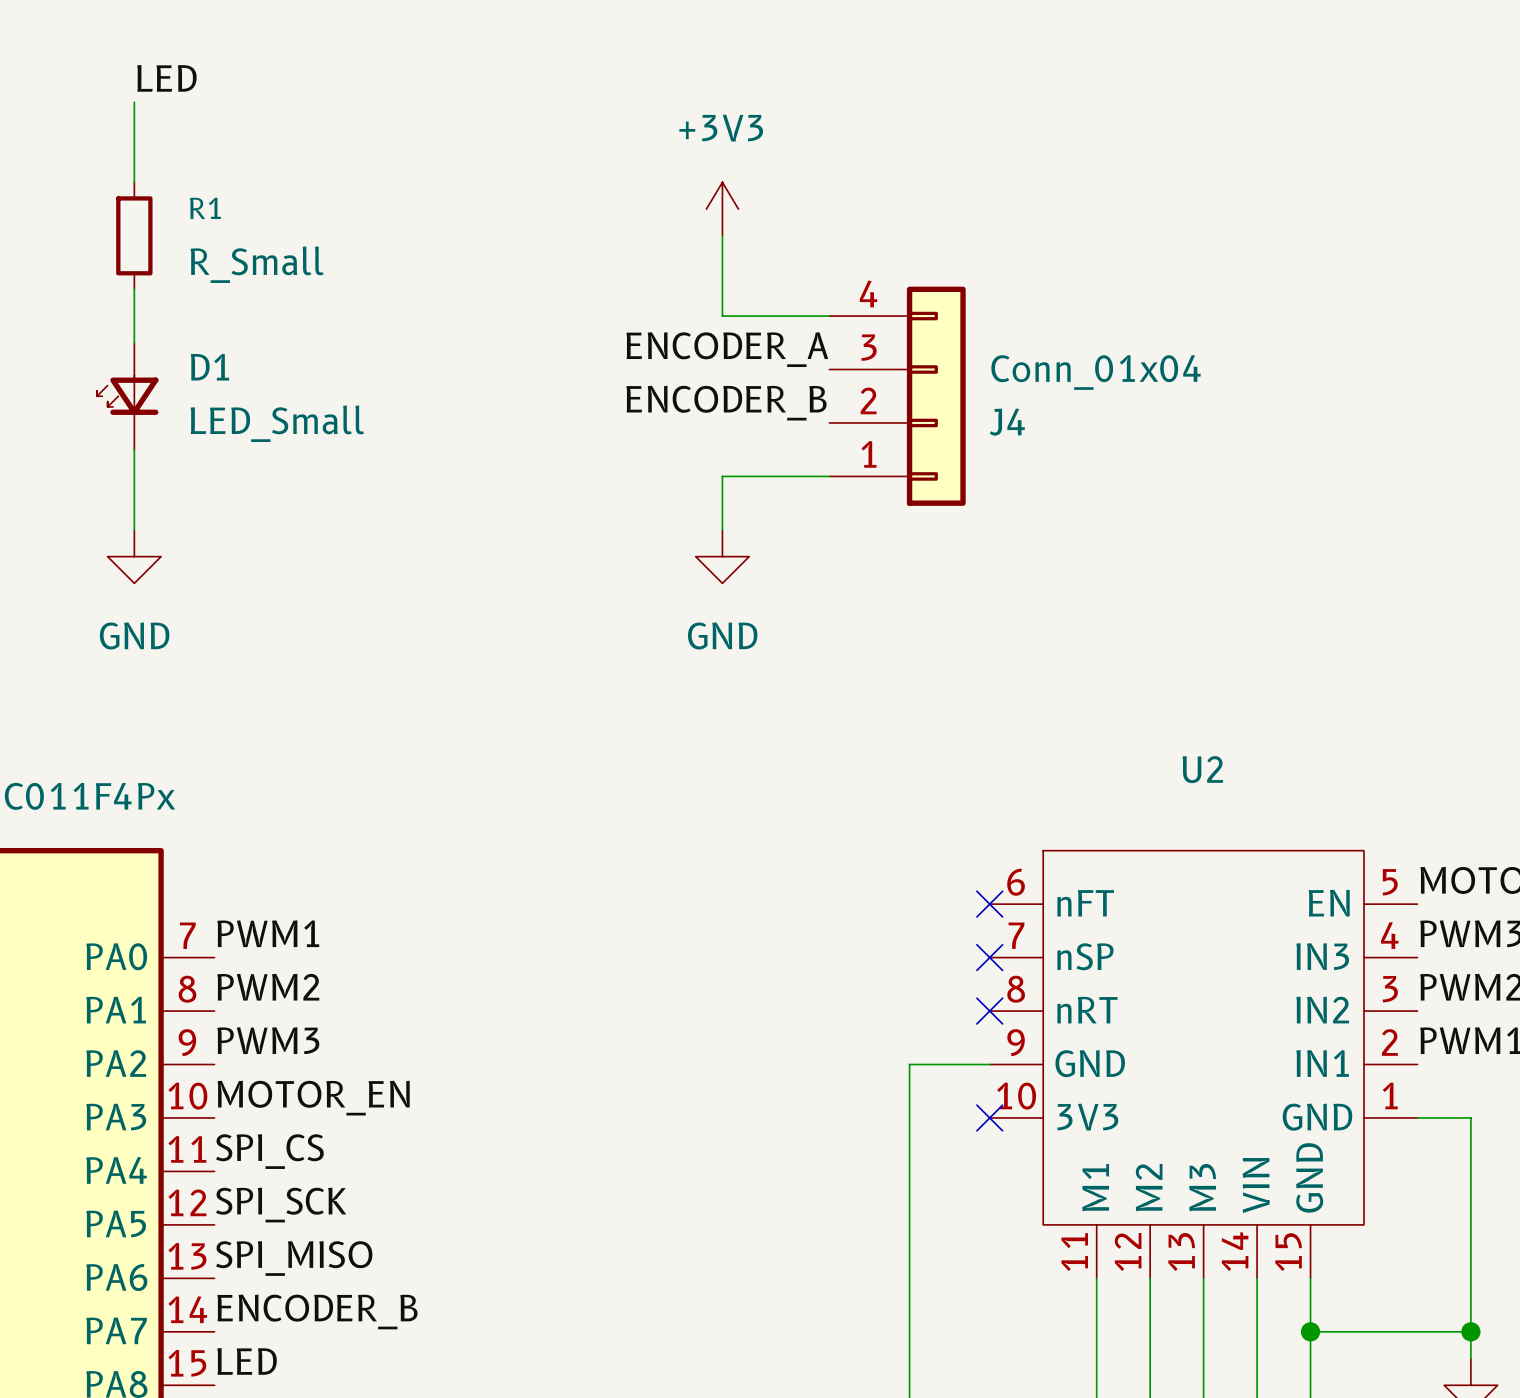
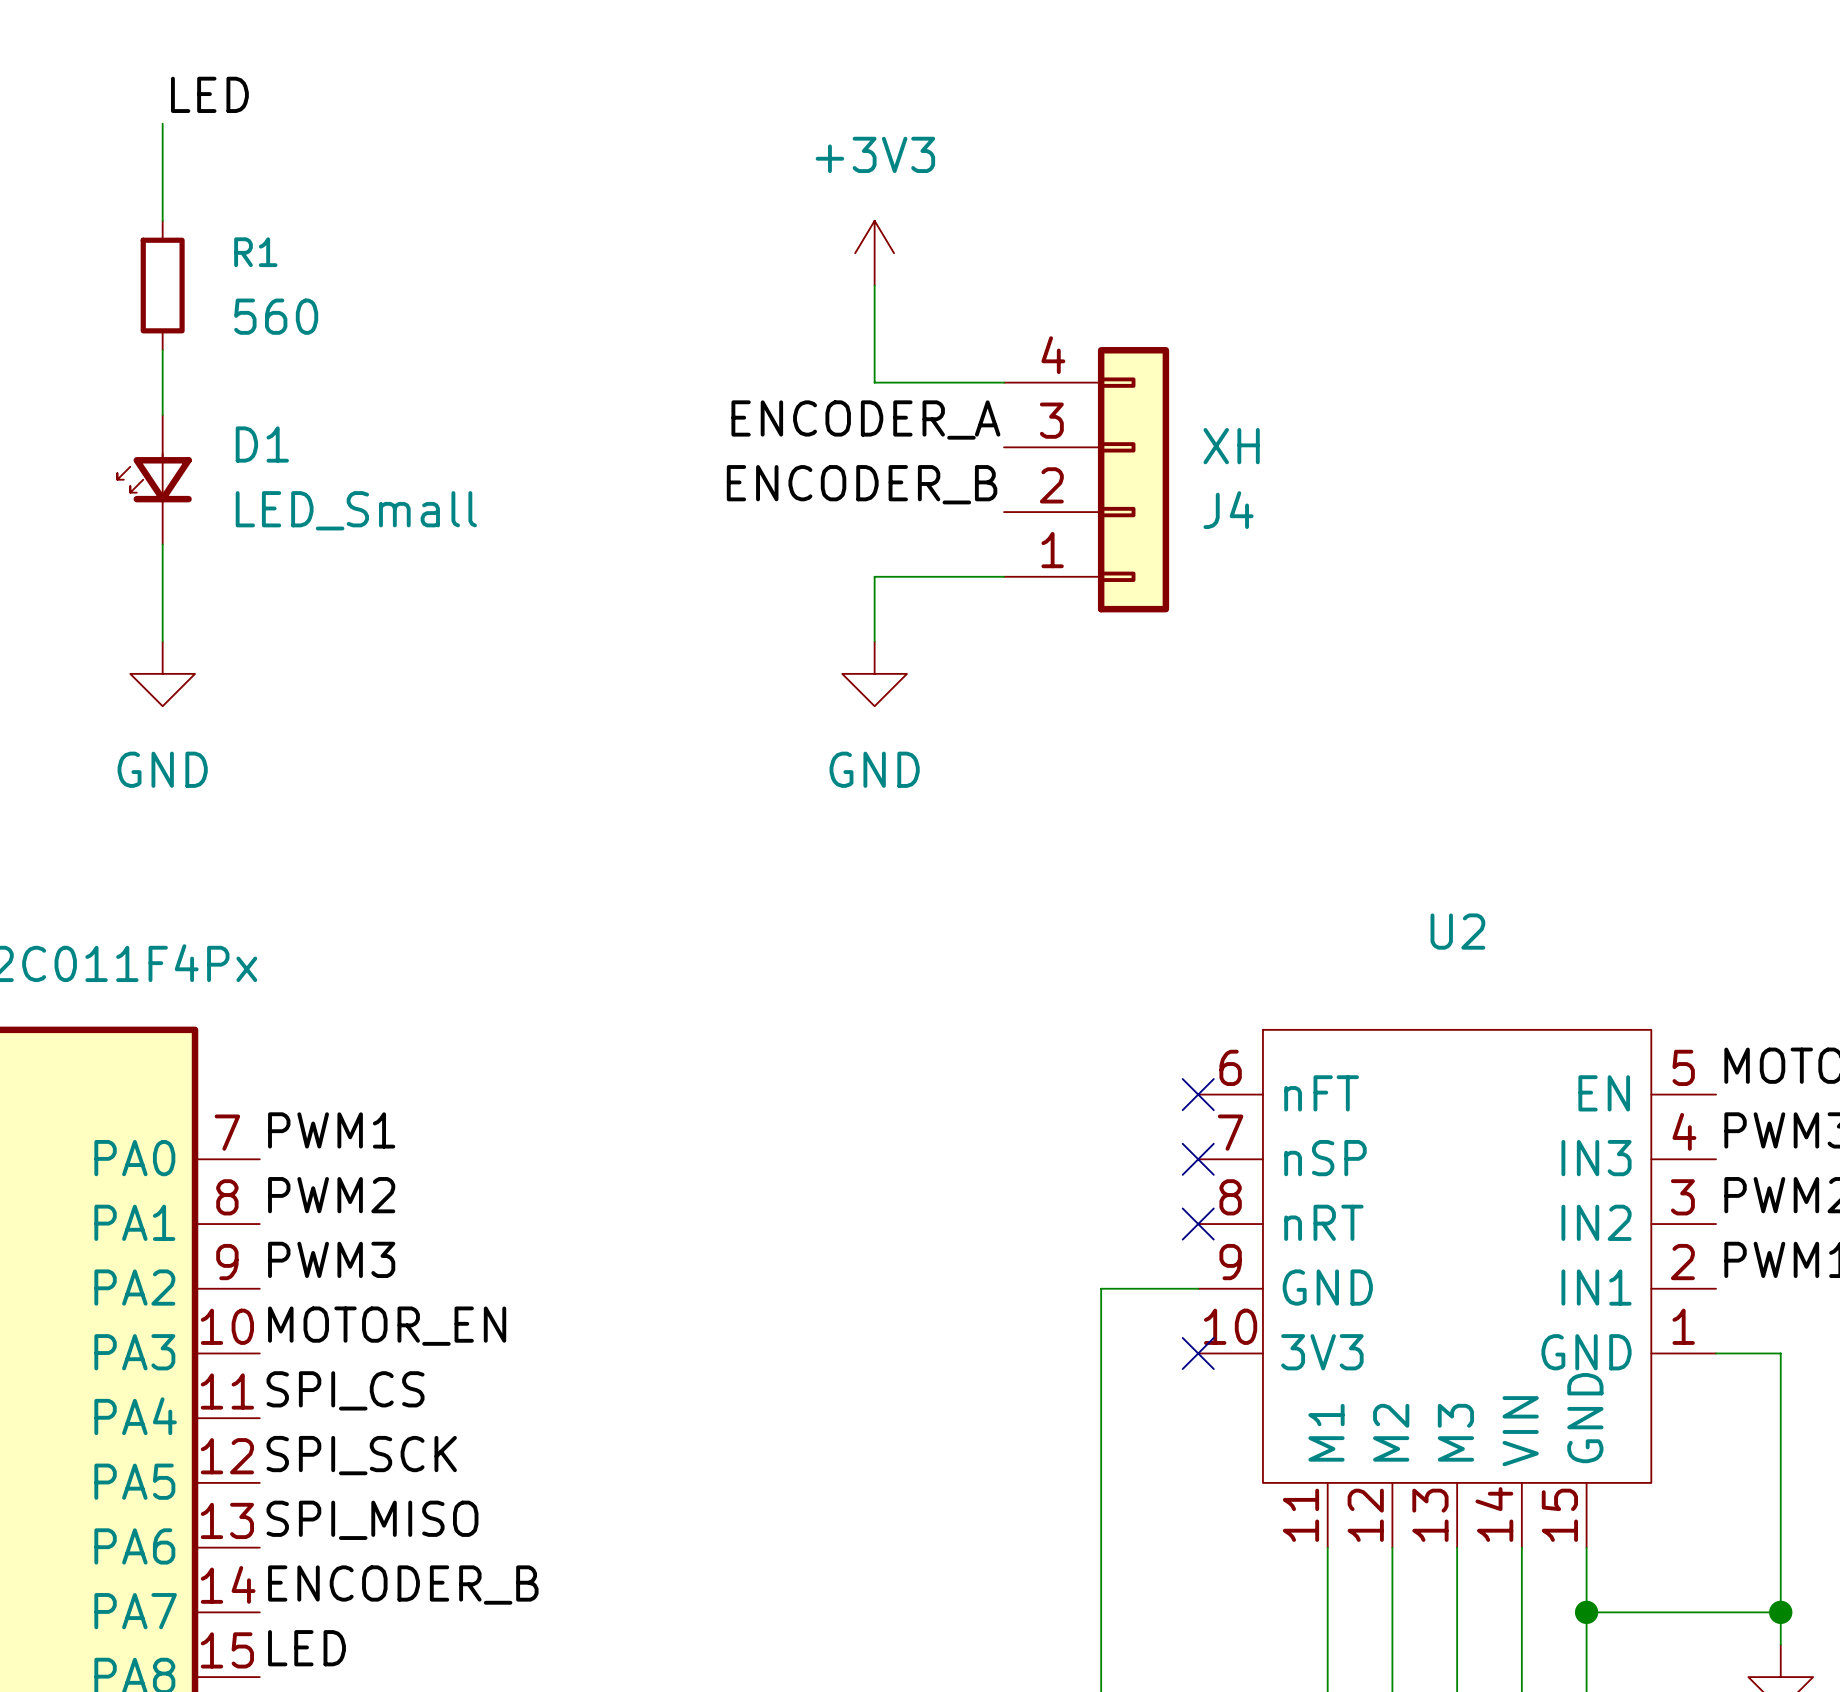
R1 value: R_Small (257, 264) -> 560 (276, 316)
J4 value: Conn_01x04 (1096, 372) -> XH (1231, 446)

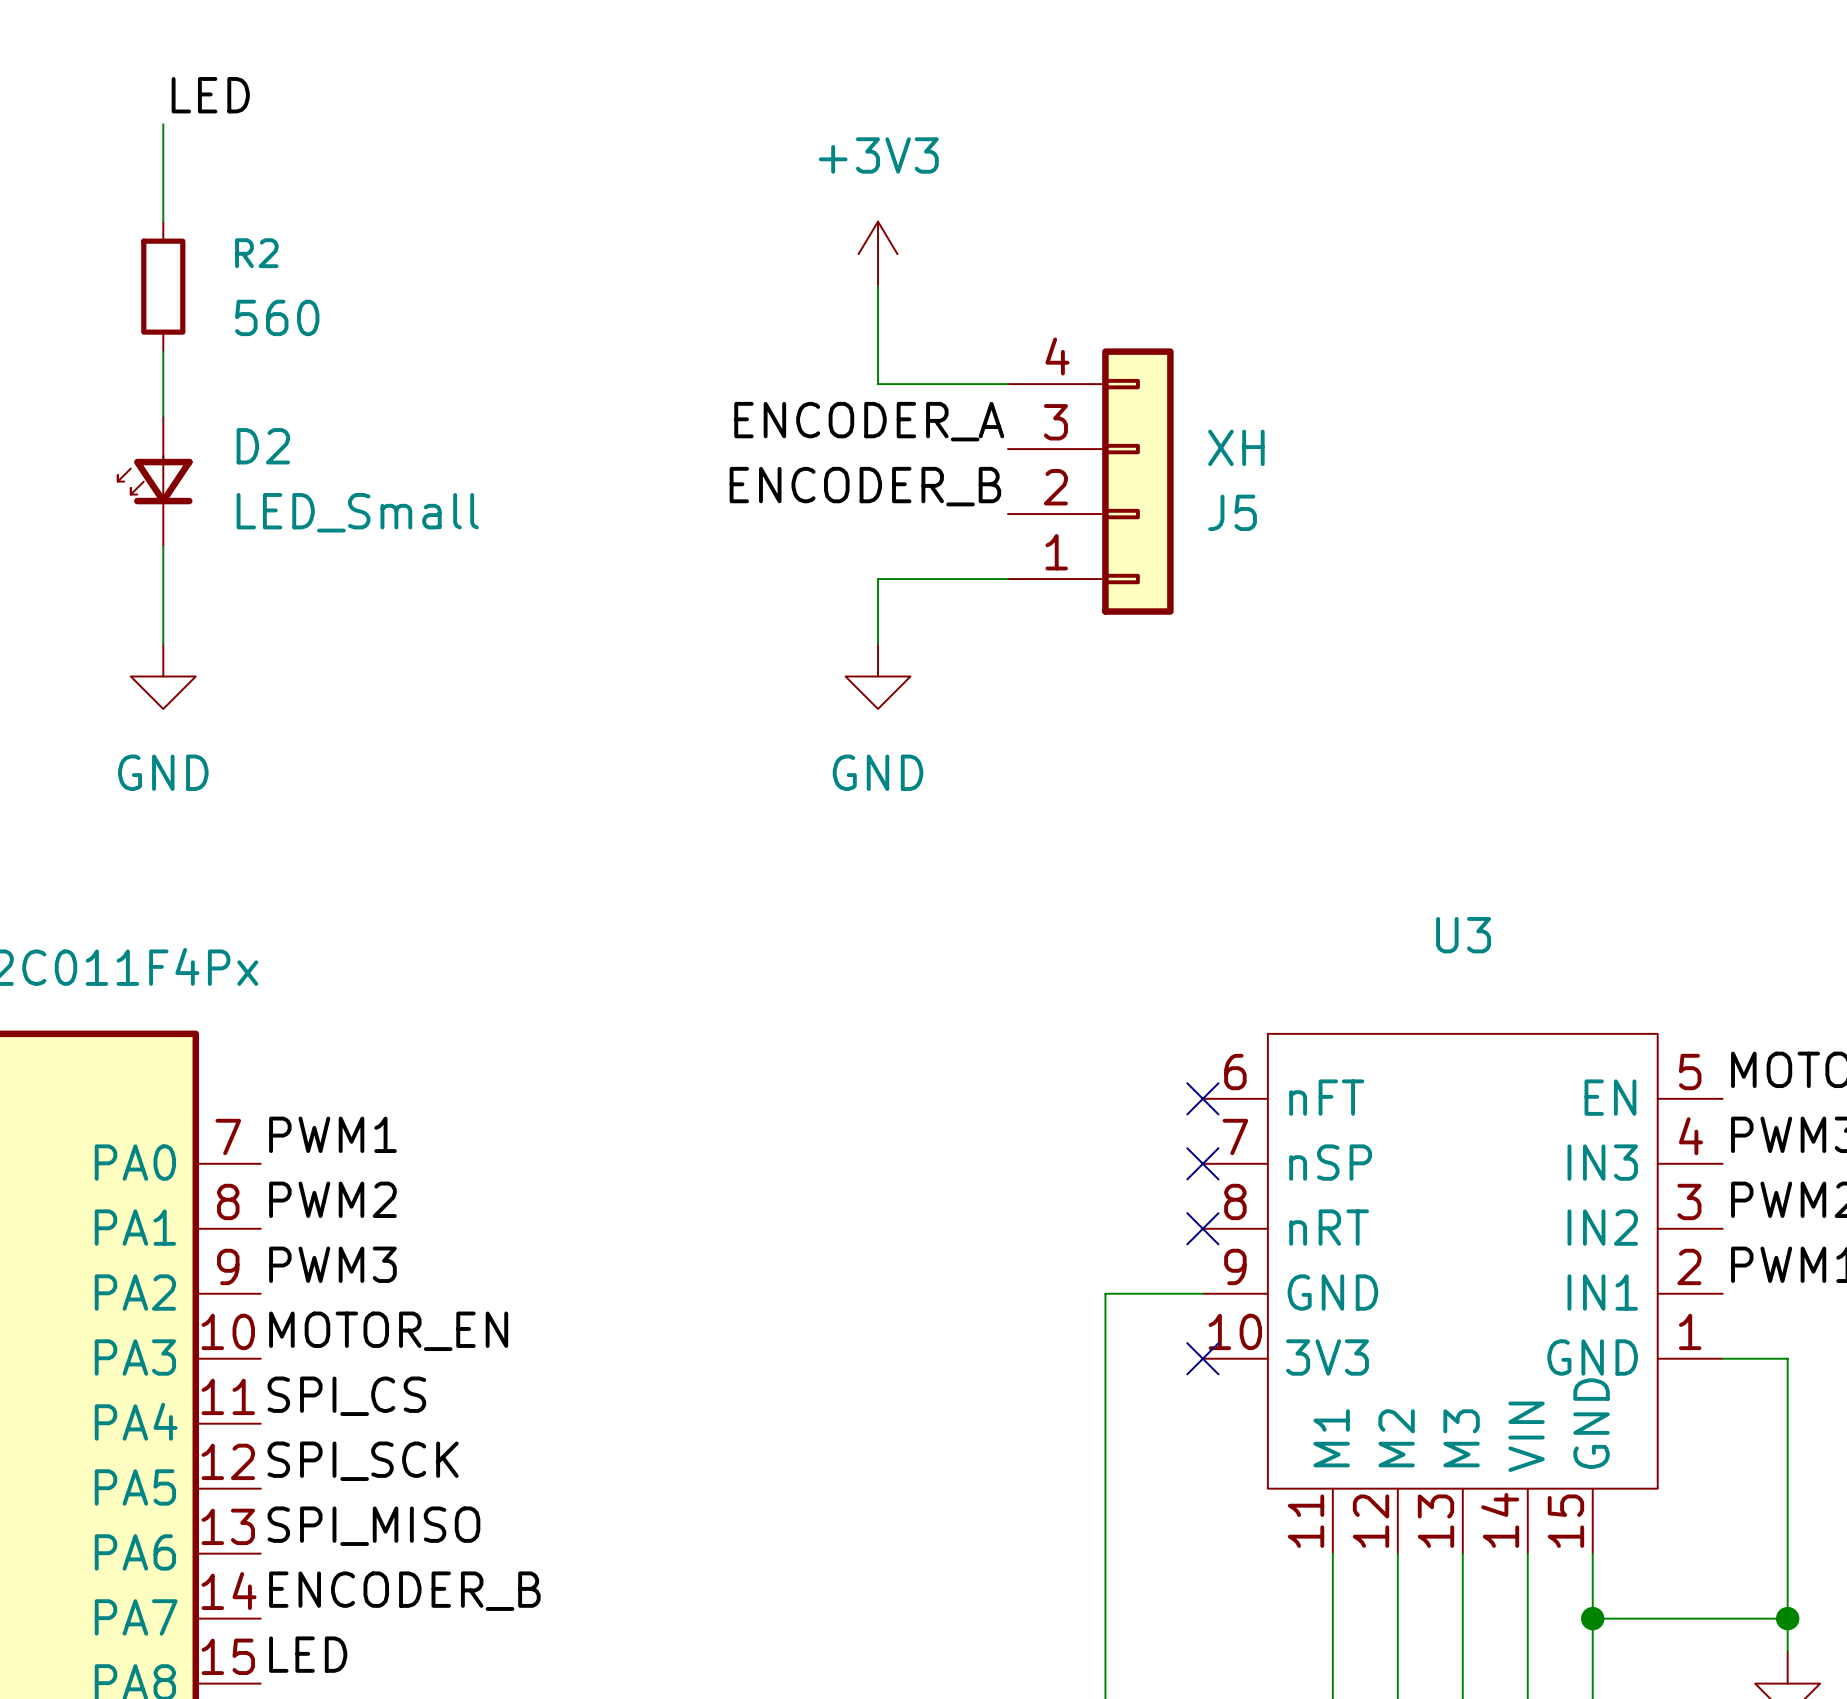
R1 name: R1 (255, 252) -> R2 (256, 253)
D1 name: D1 (262, 444) -> D2 (263, 446)
J4 name: J4 (1228, 510) -> J5 (1232, 512)
U2 name: U2 (1457, 931) -> U3 (1463, 935)

